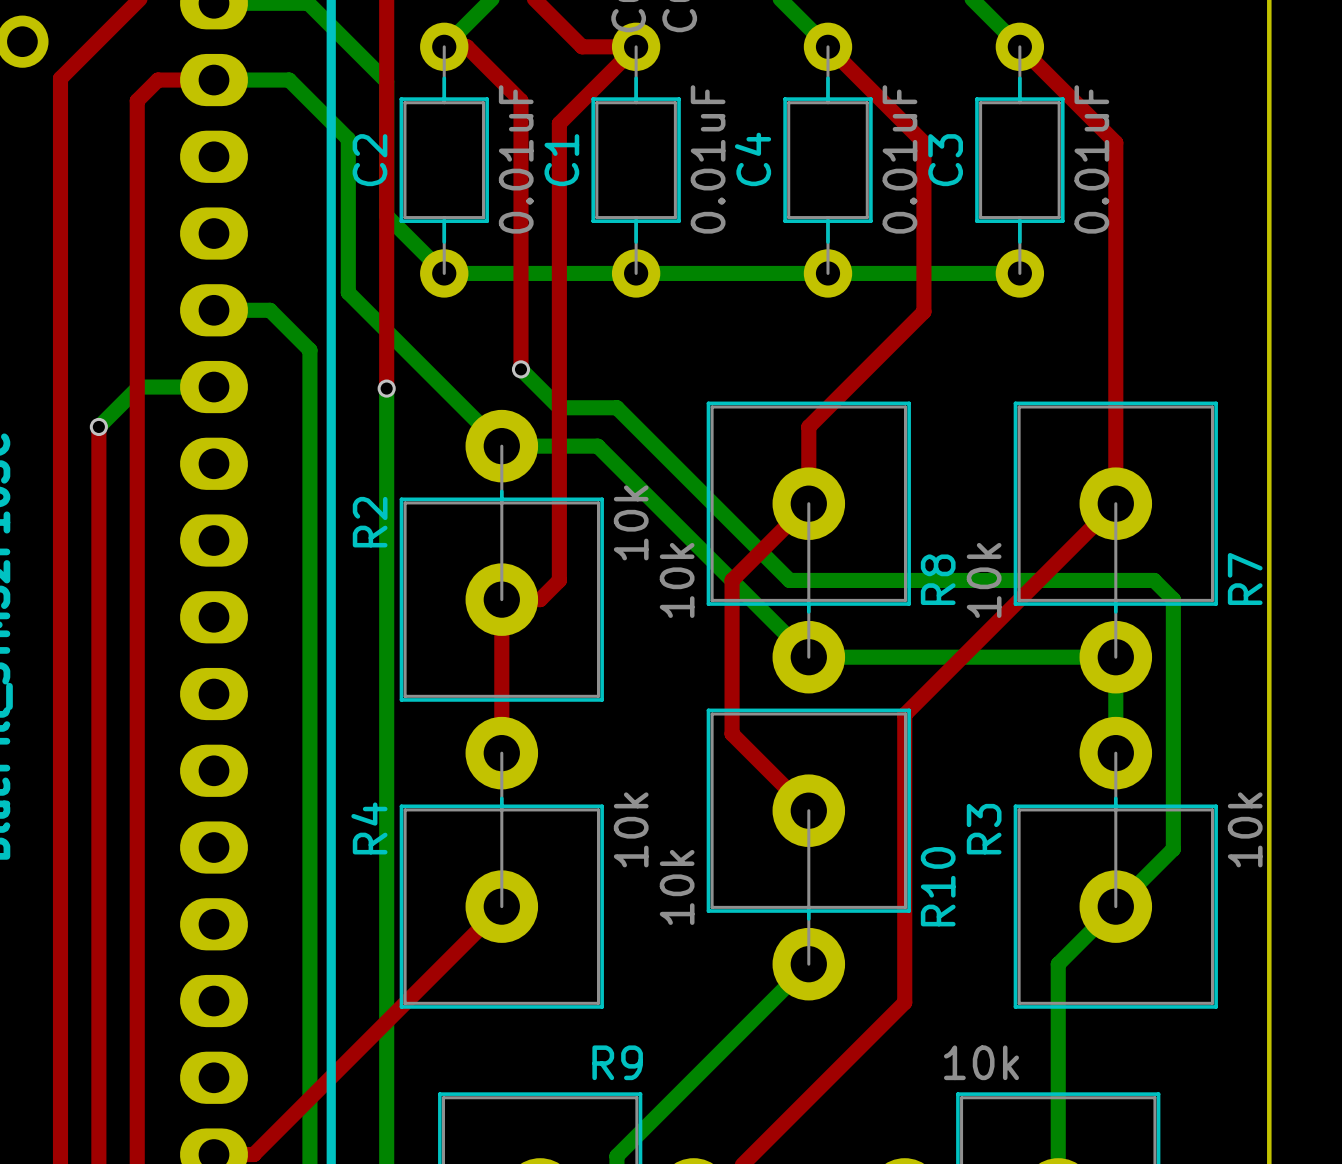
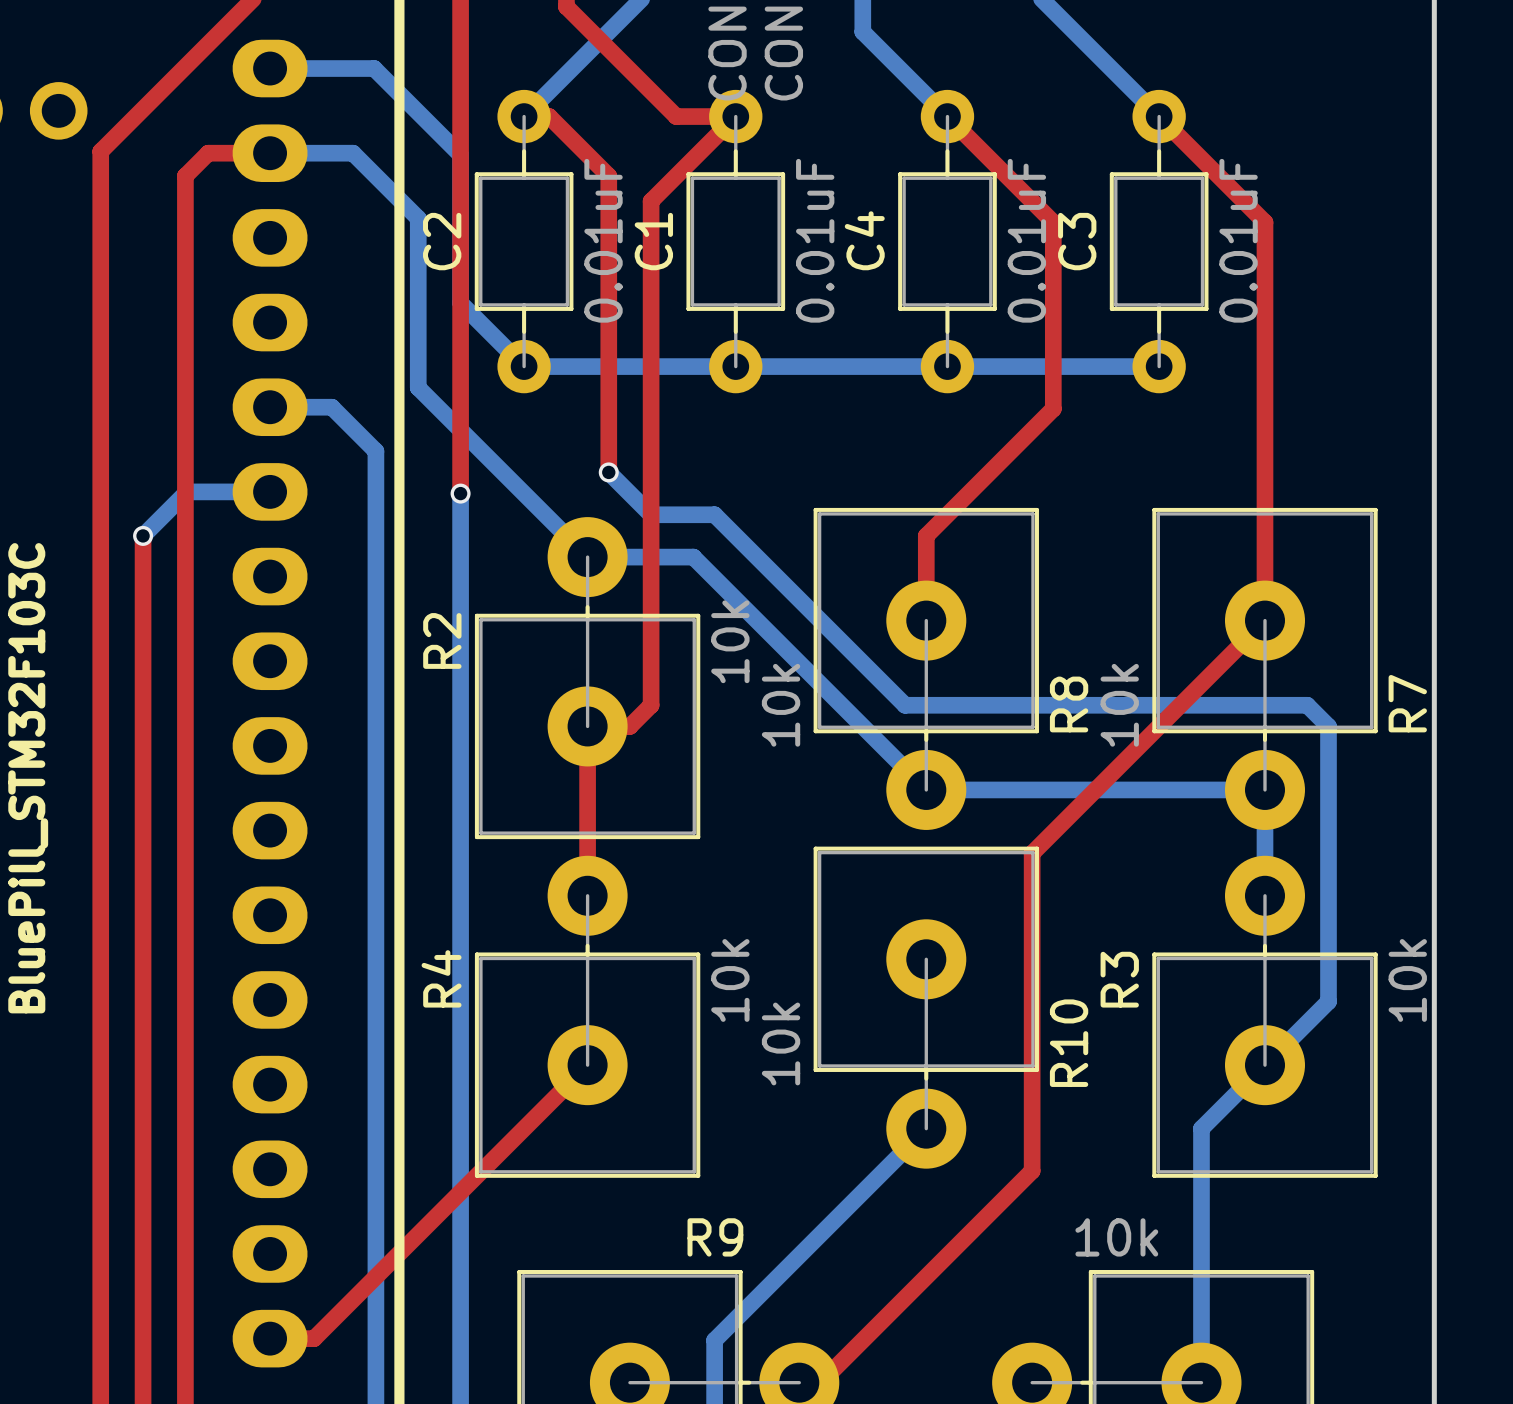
top track: (808, 503) (732, 580) (732, 733) (808, 810) -> none

